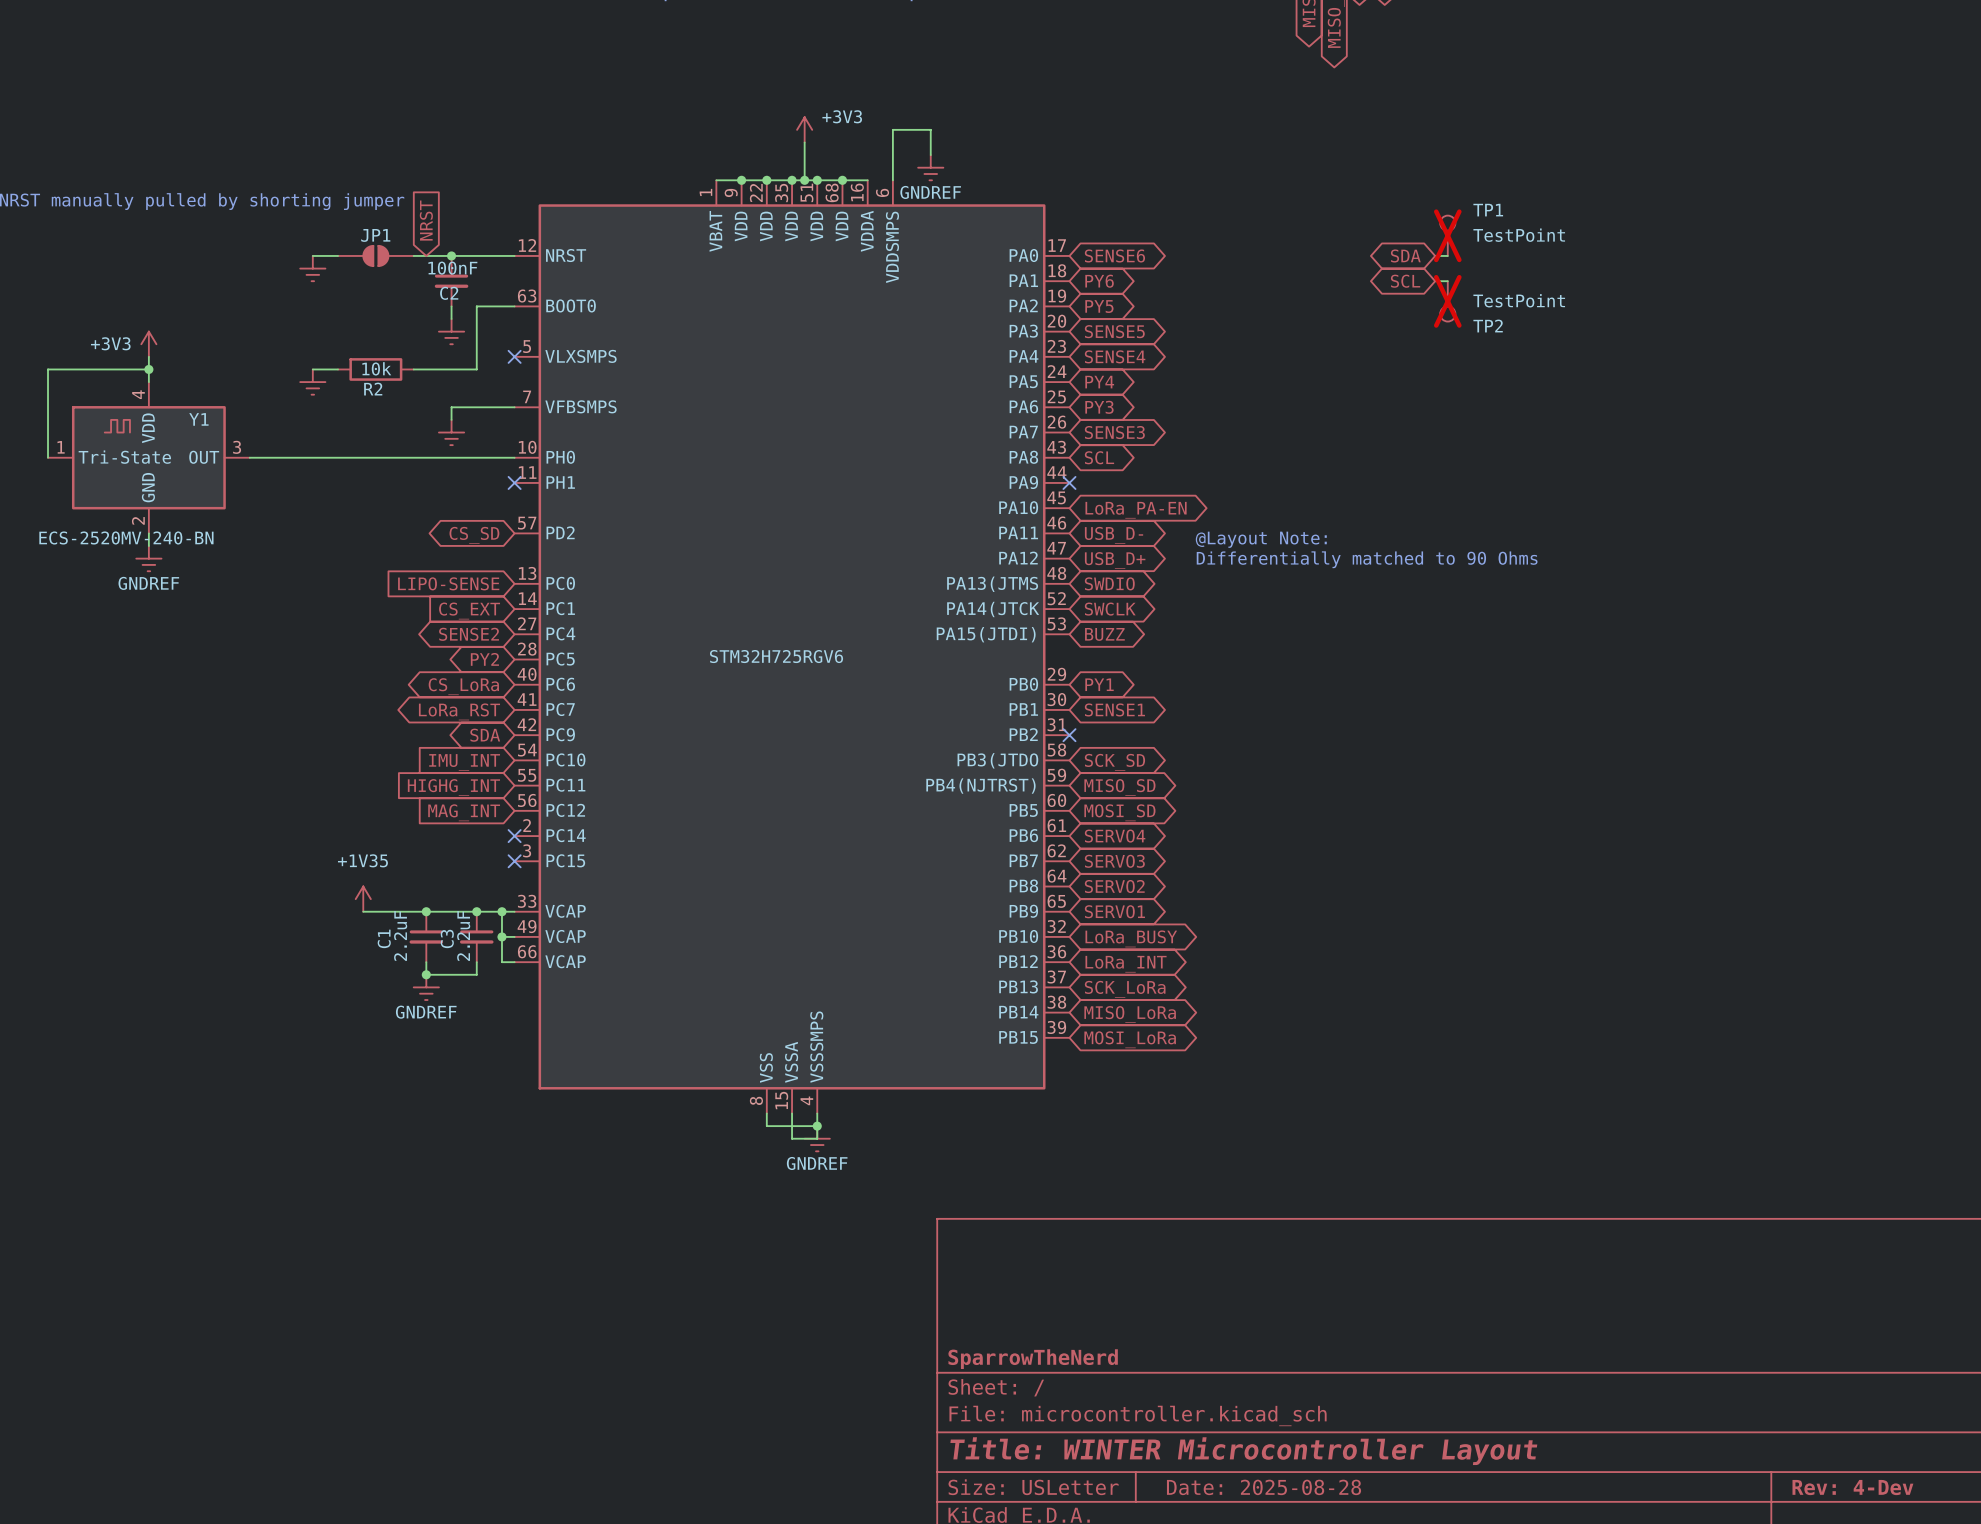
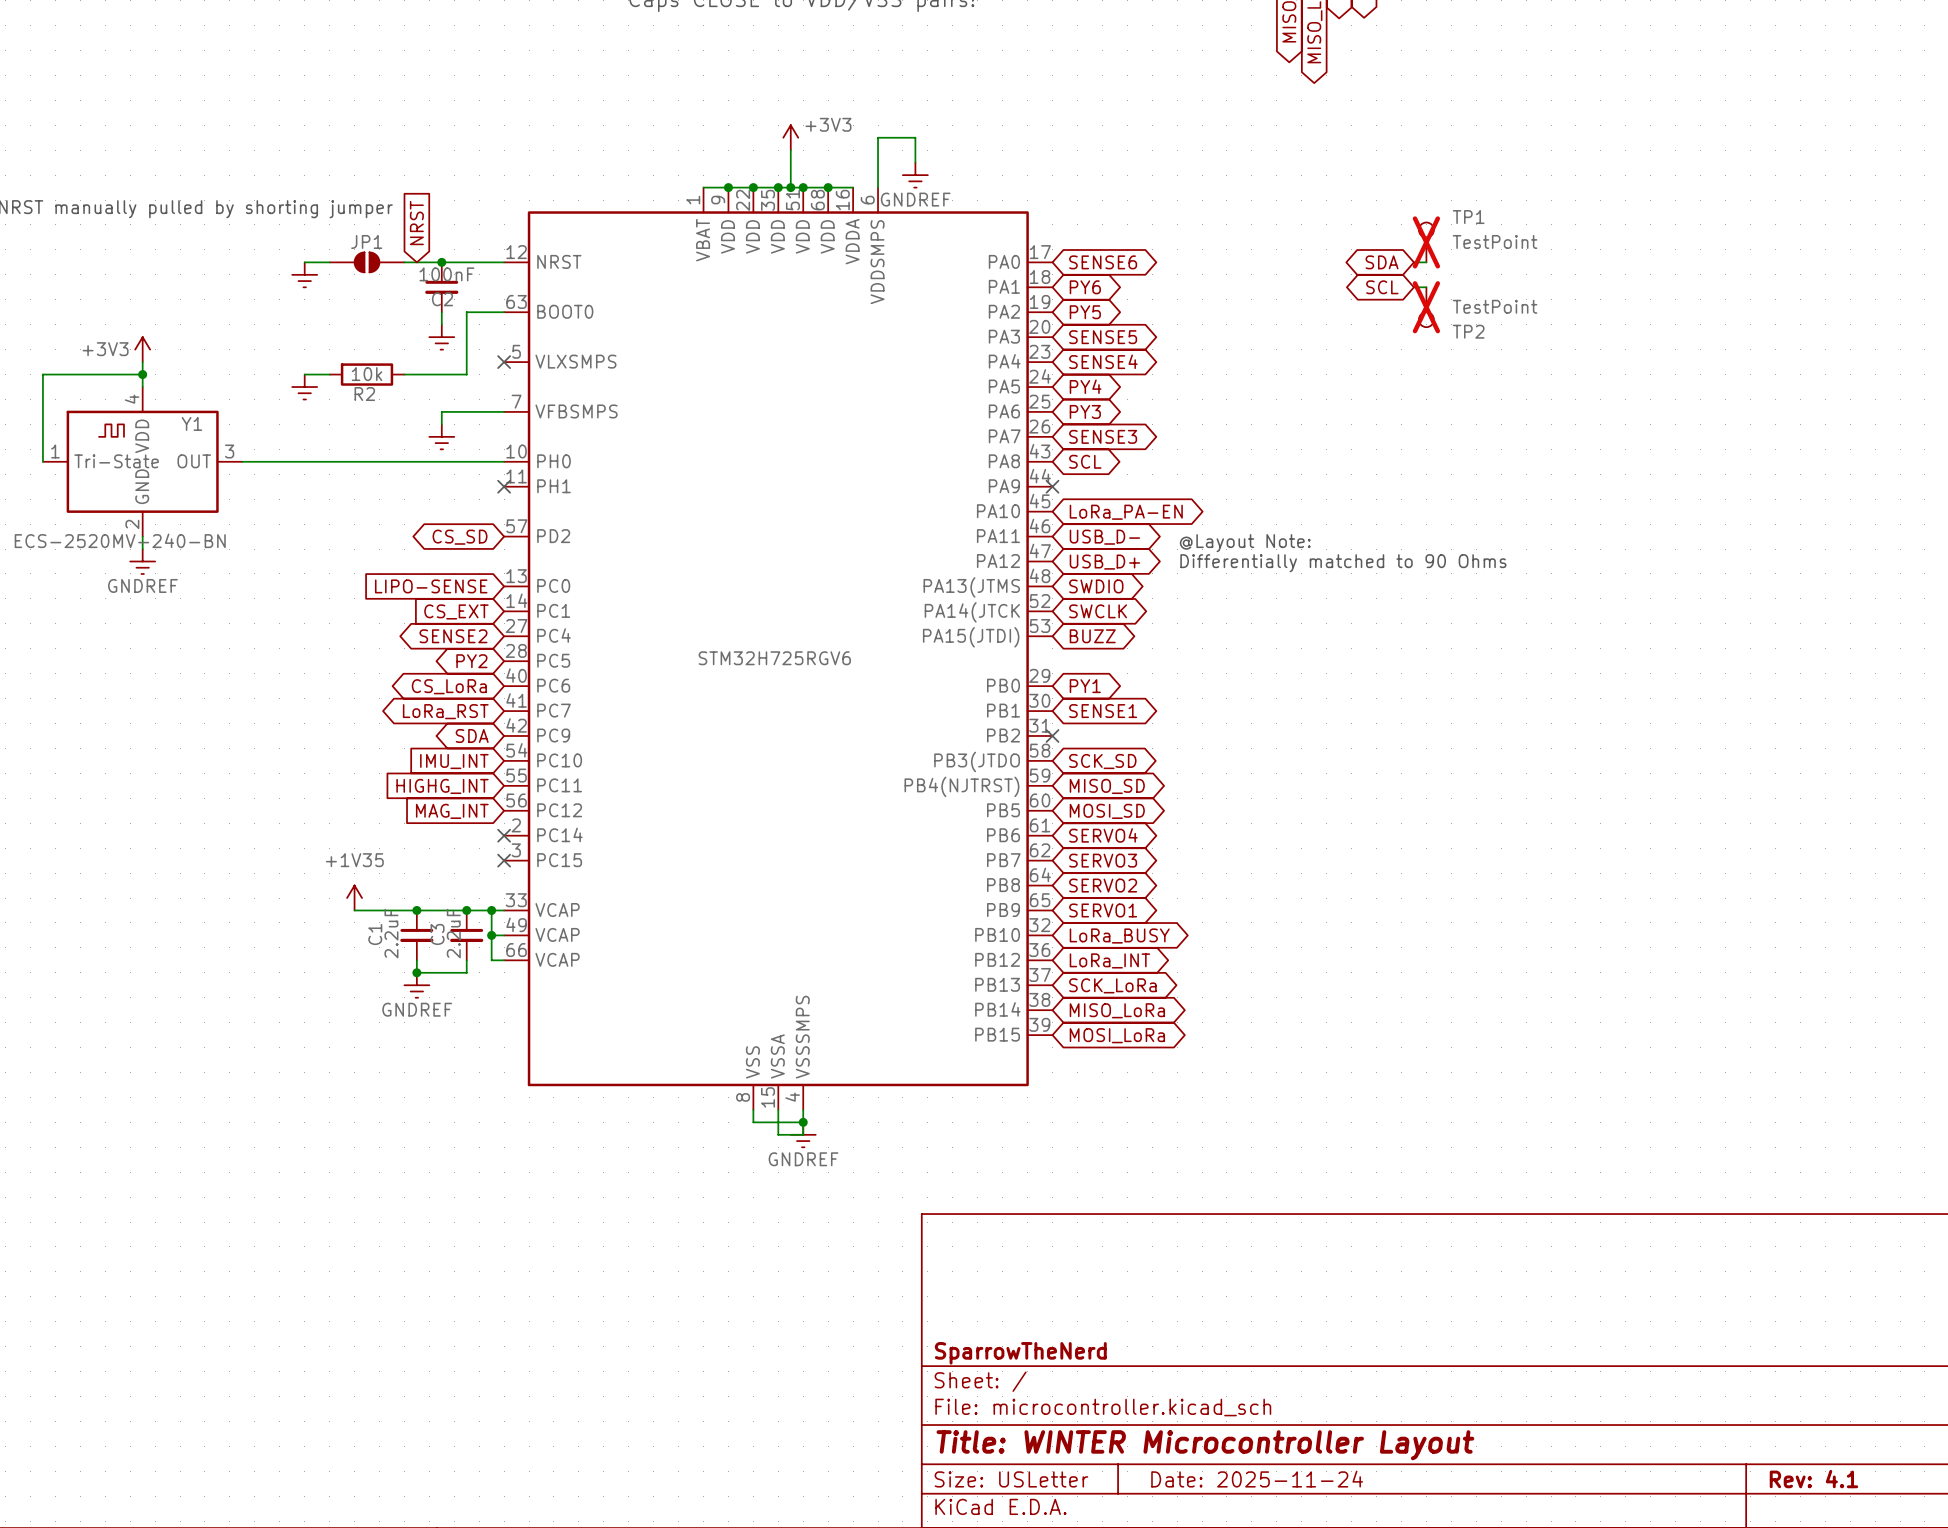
title block: Date: 2025-08-28 (1264, 1487) -> Date: 2025-11-24 (1257, 1479)
title block: Rev: 4-Dev (1852, 1487) -> Rev: 4.1 (1813, 1479)

